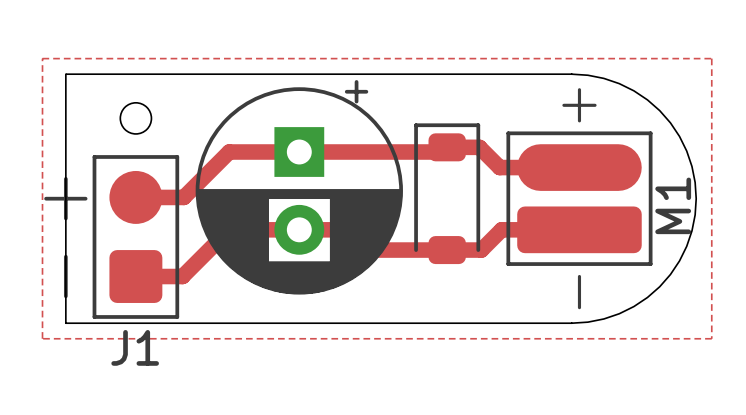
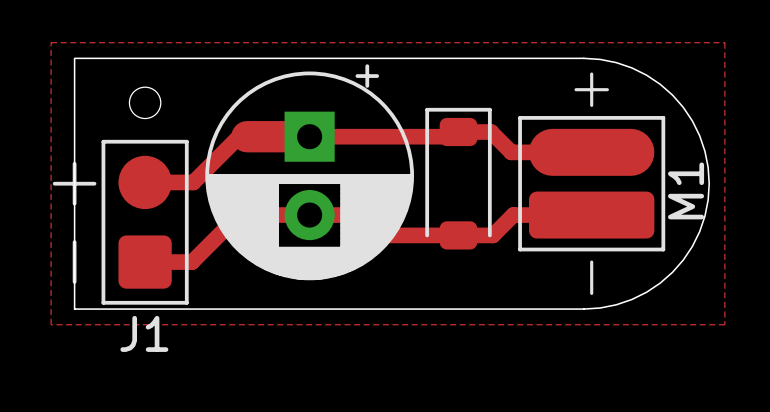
track width: thin (237, 152) (299, 152) -> thick (246, 136) (309, 136)

